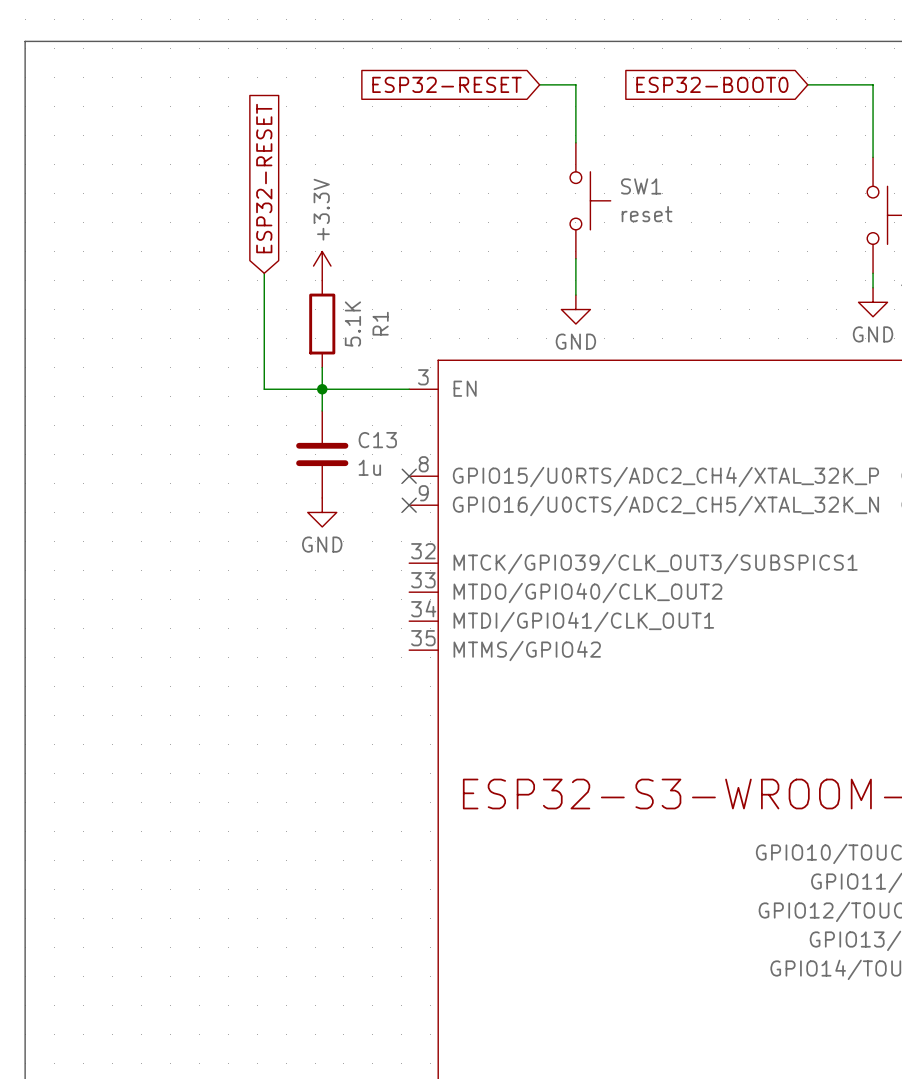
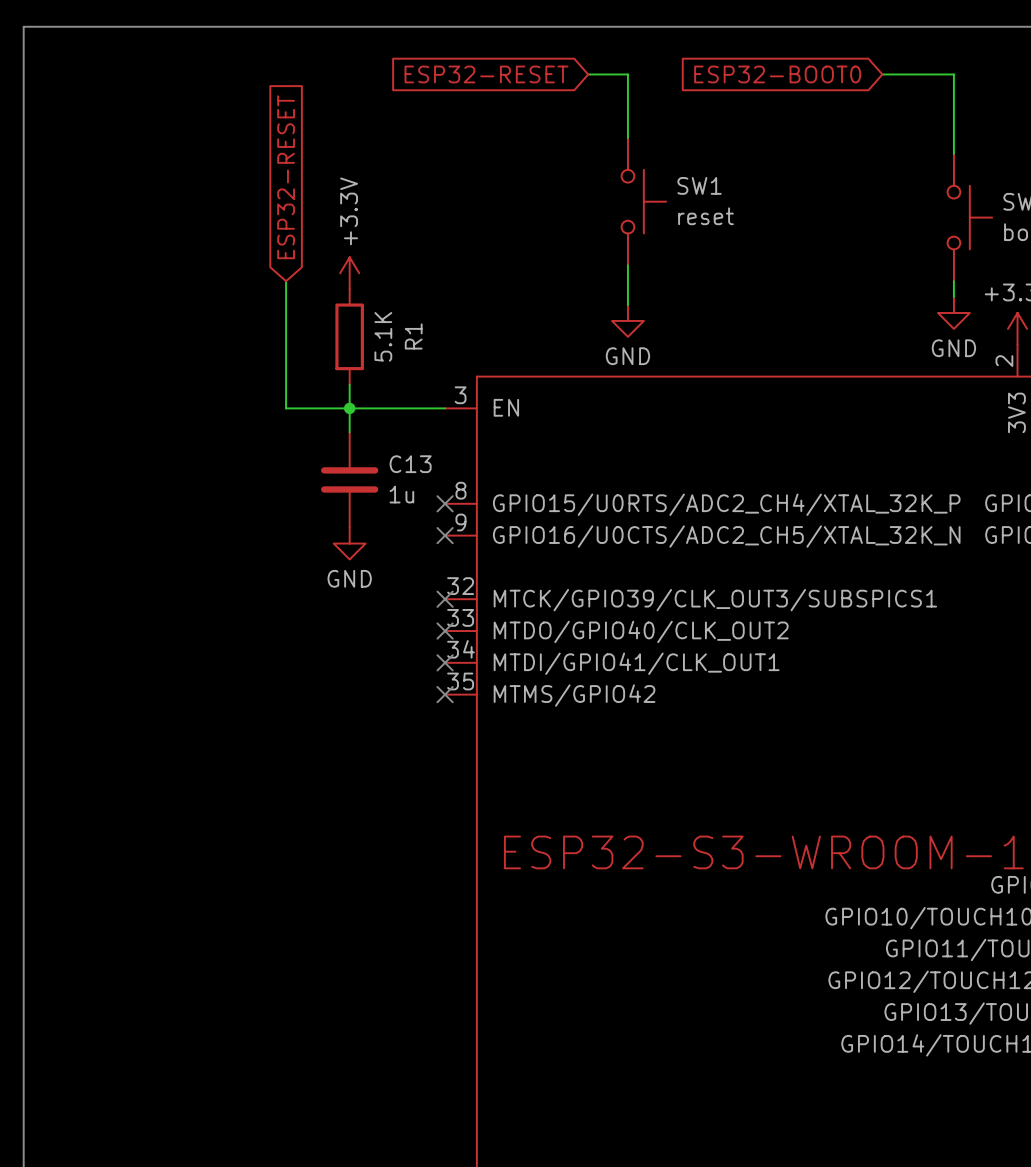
no-connect mark: none -> (445, 599)
no-connect mark: none -> (445, 631)
no-connect mark: none -> (445, 662)
no-connect mark: none -> (445, 694)

